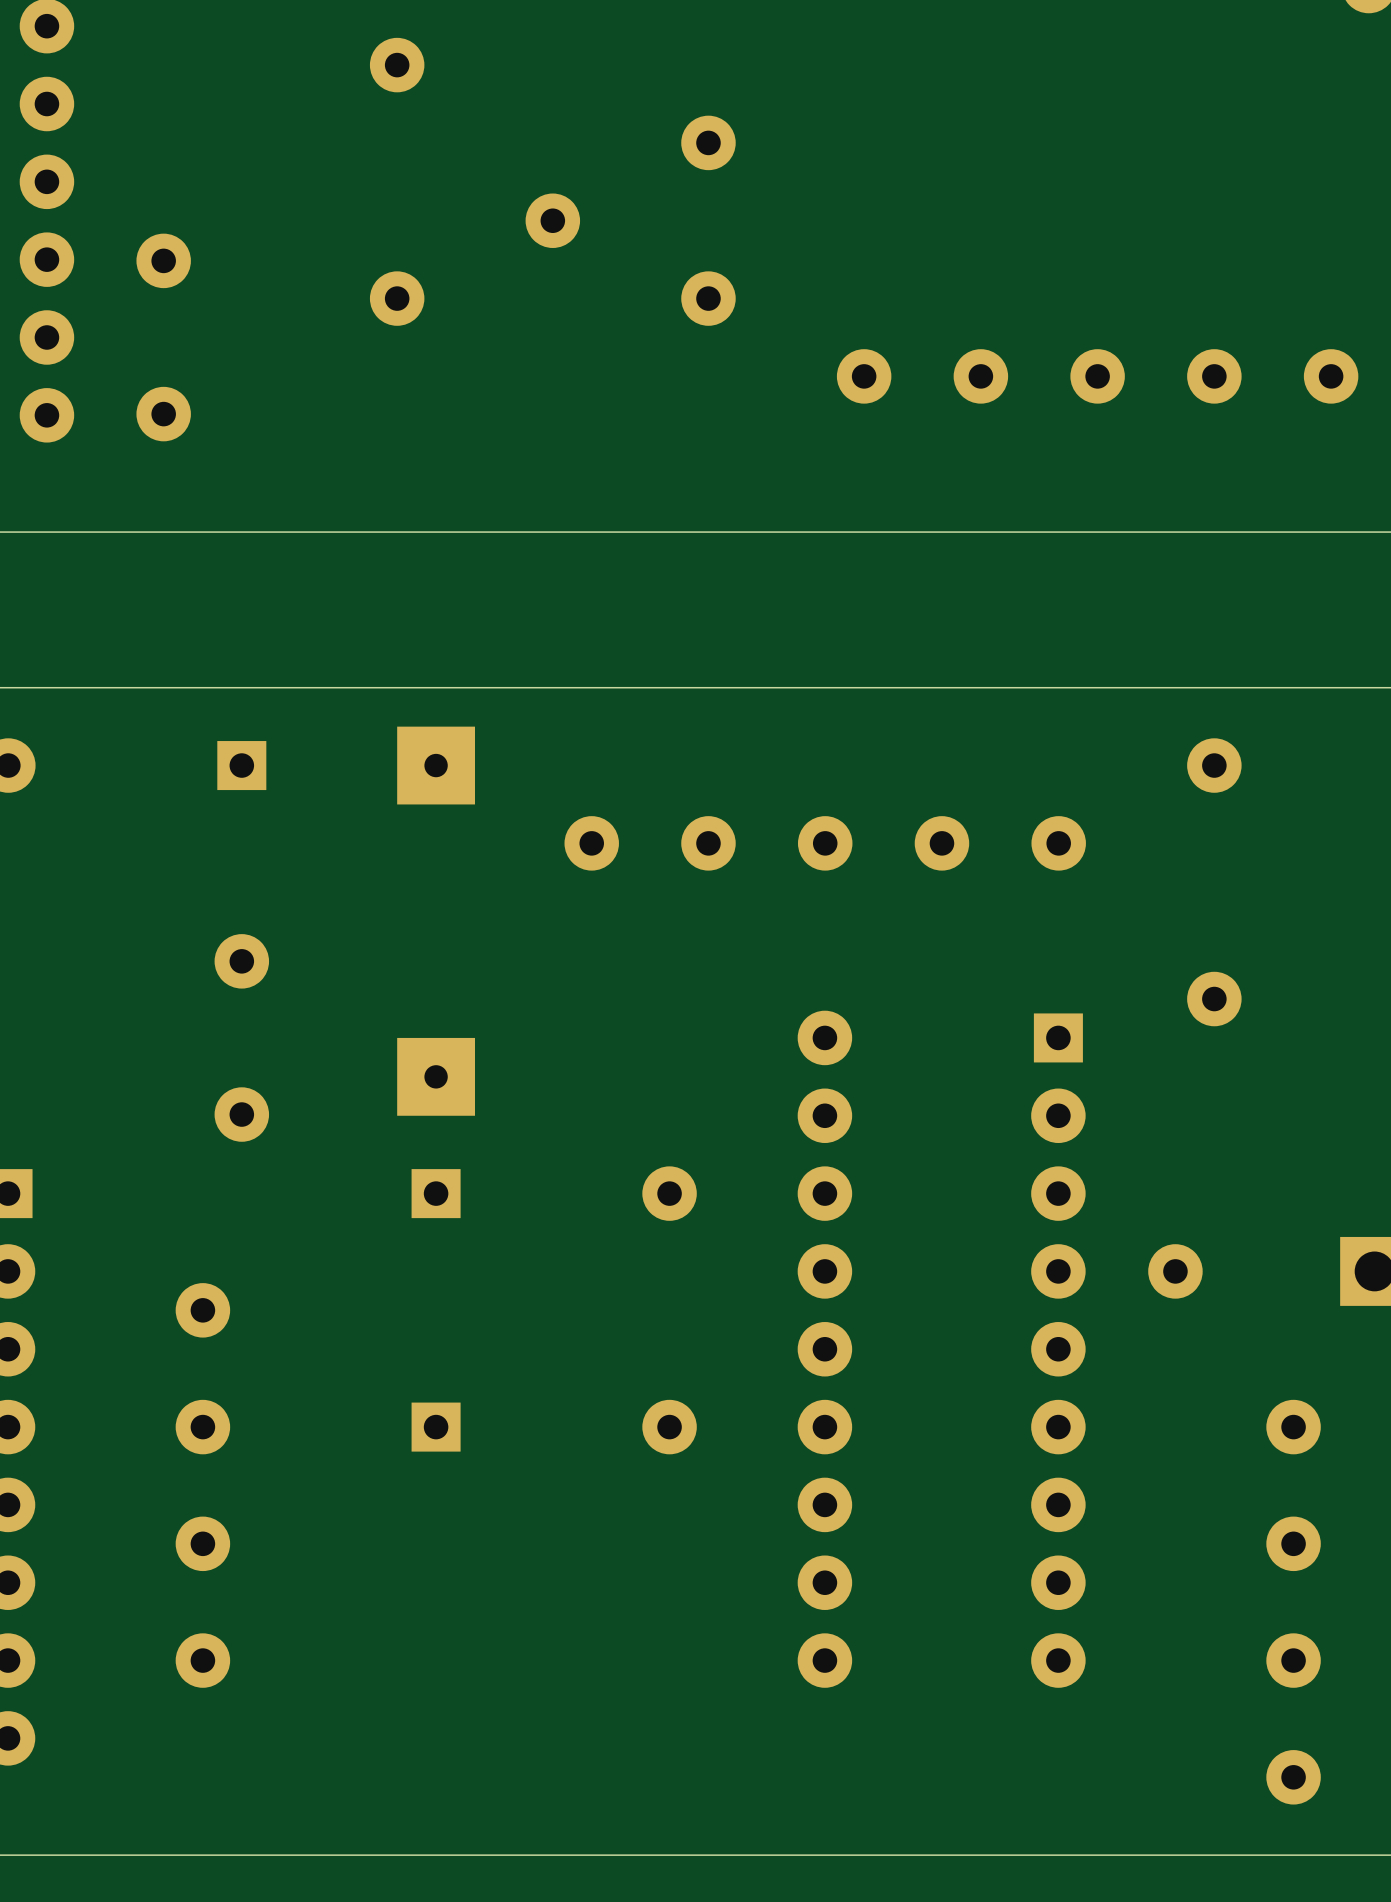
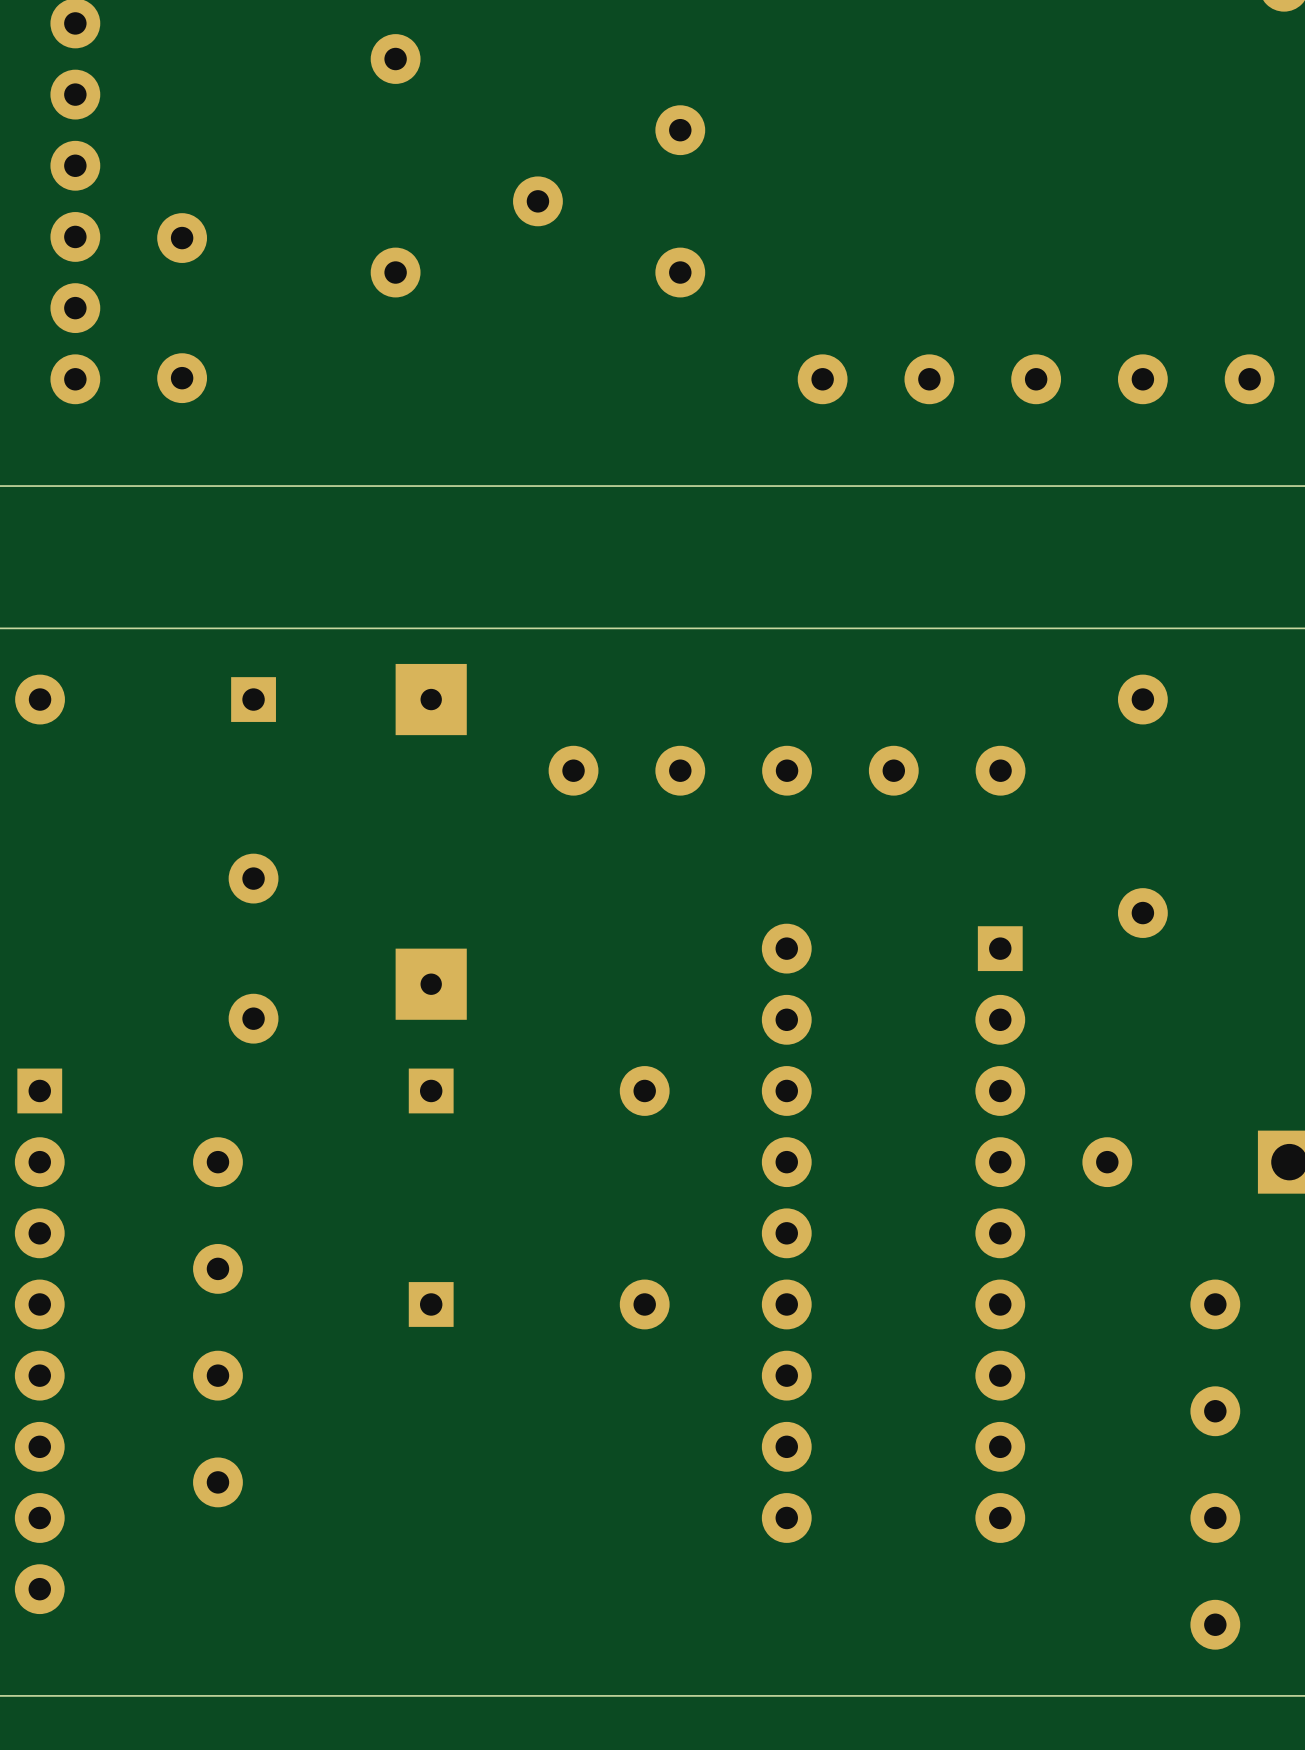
part position: (1097, 376) -> (1036, 379)
part position: (202, 1485) -> (217, 1322)

